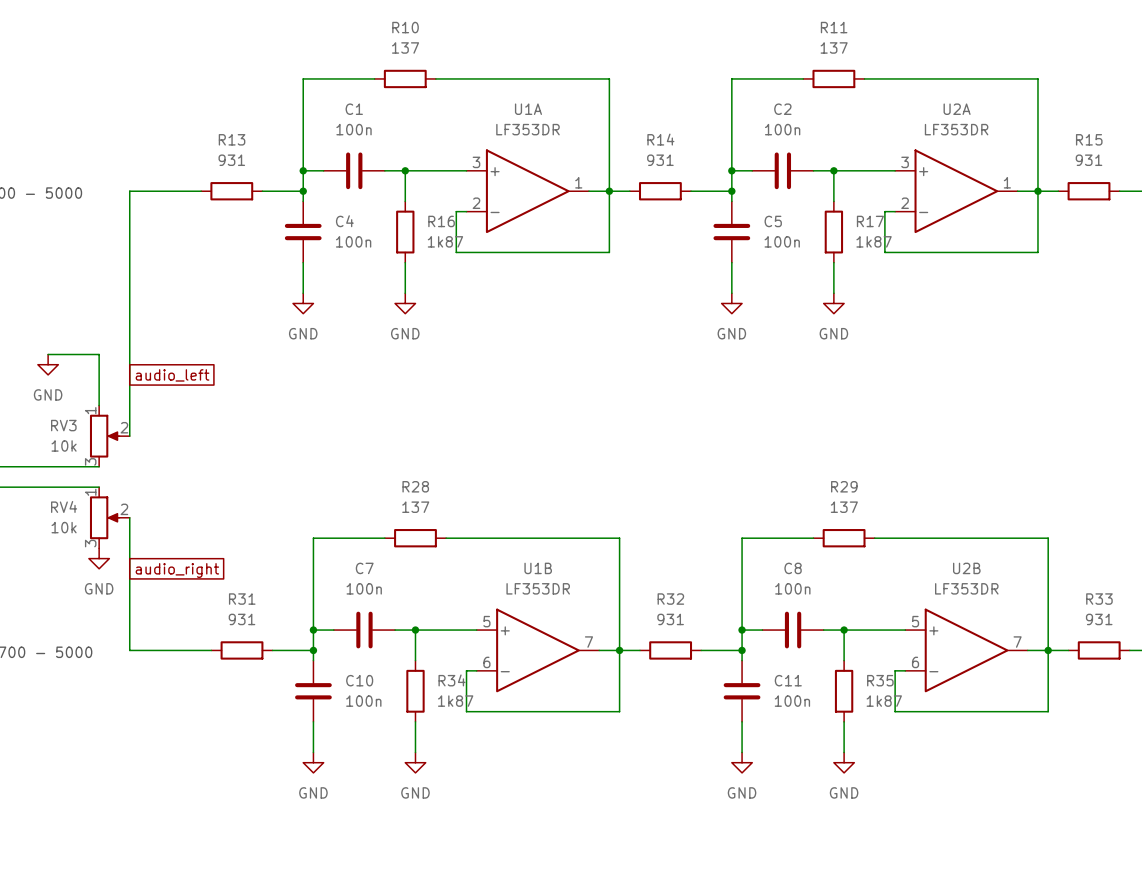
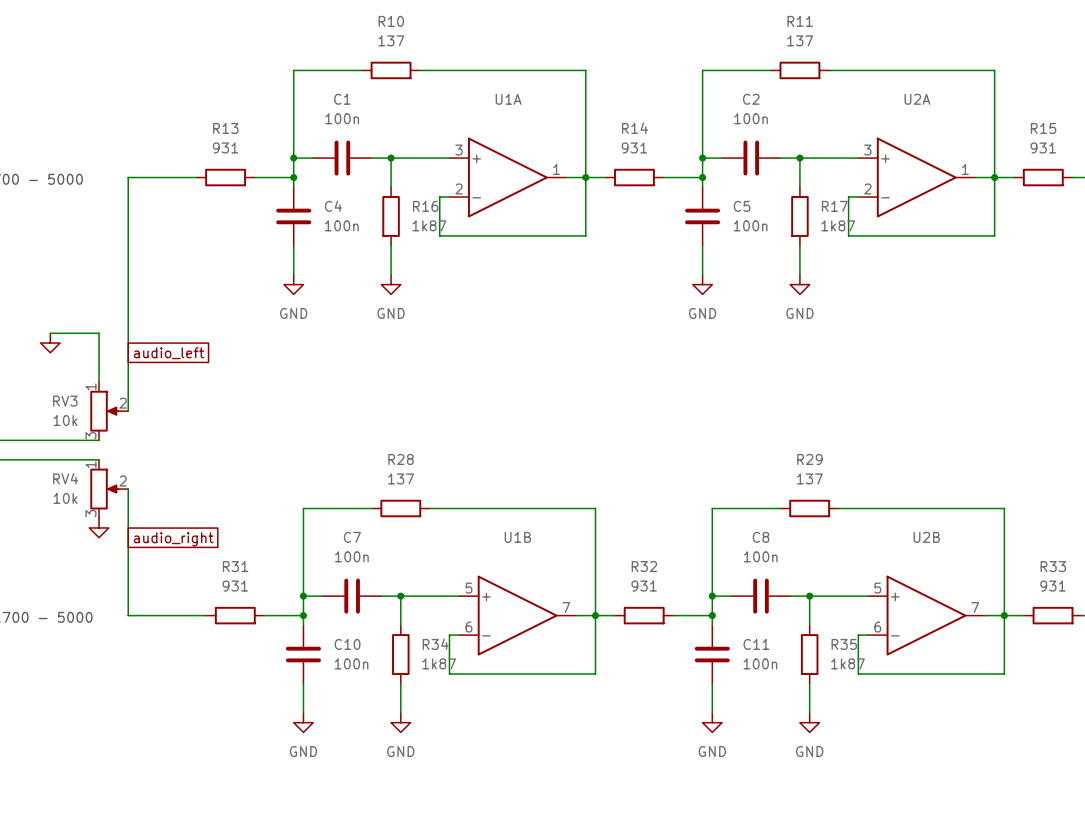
U1A value: LF353DR (527, 129) -> none
U2A value: LF353DR (956, 129) -> none
power symbol text: GND (48, 394) -> none
power symbol text: GND (99, 588) -> none
U1B value: LF353DR (538, 588) -> none
U2B value: LF353DR (966, 588) -> none

